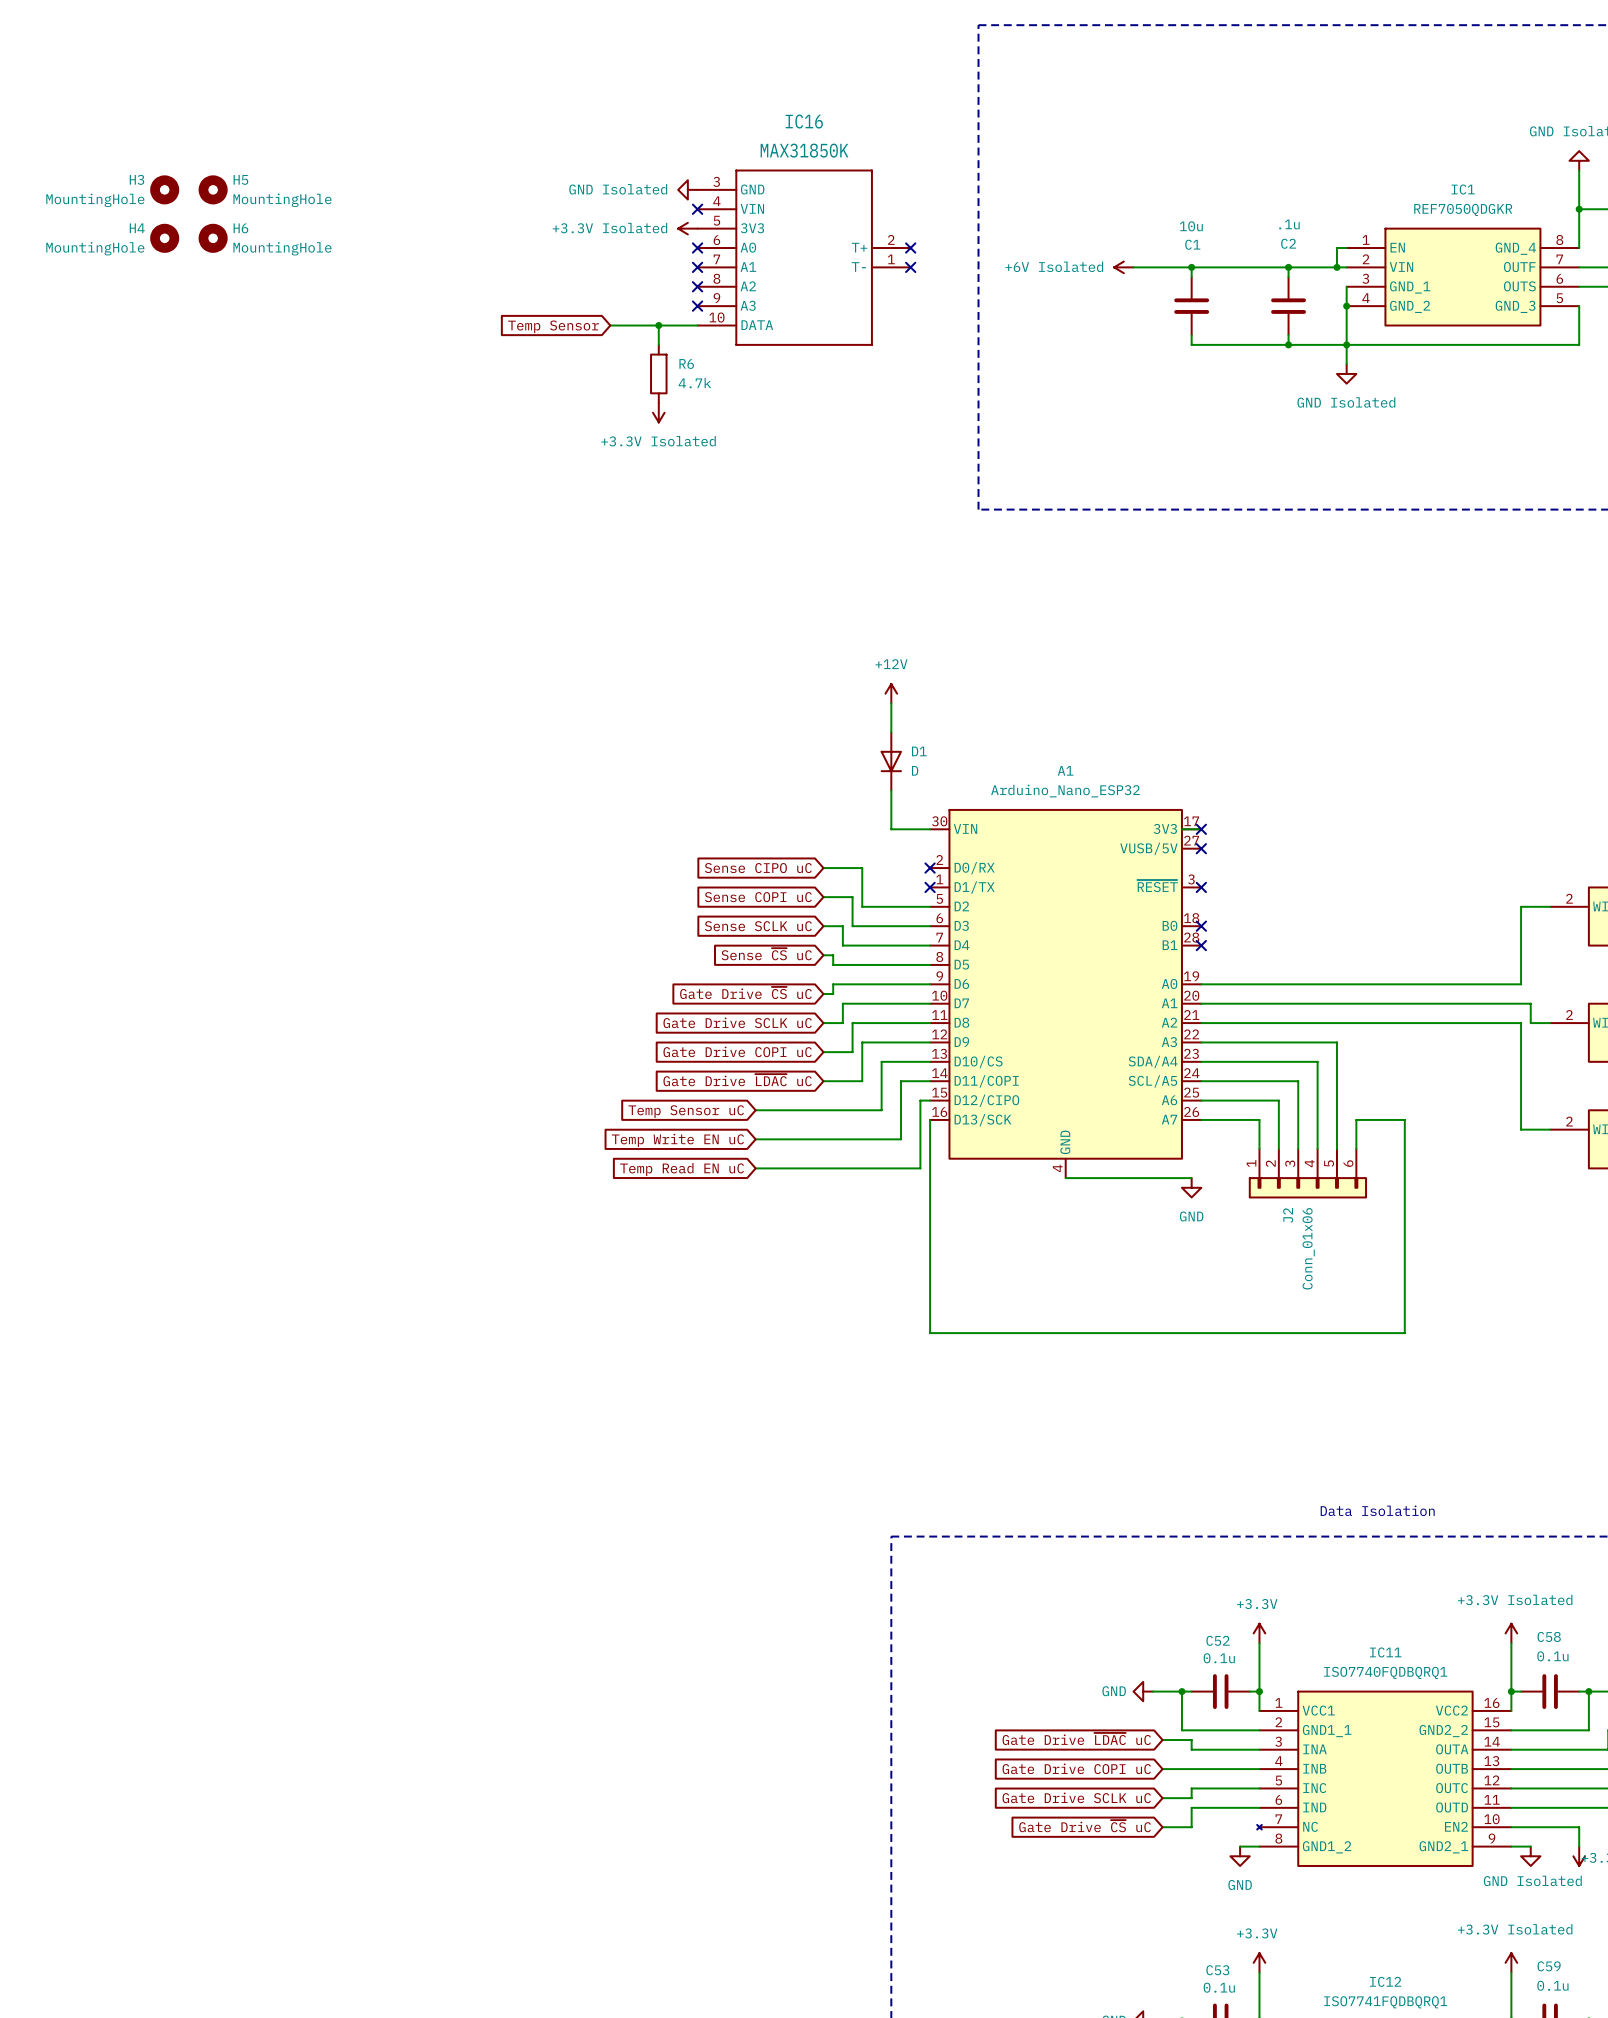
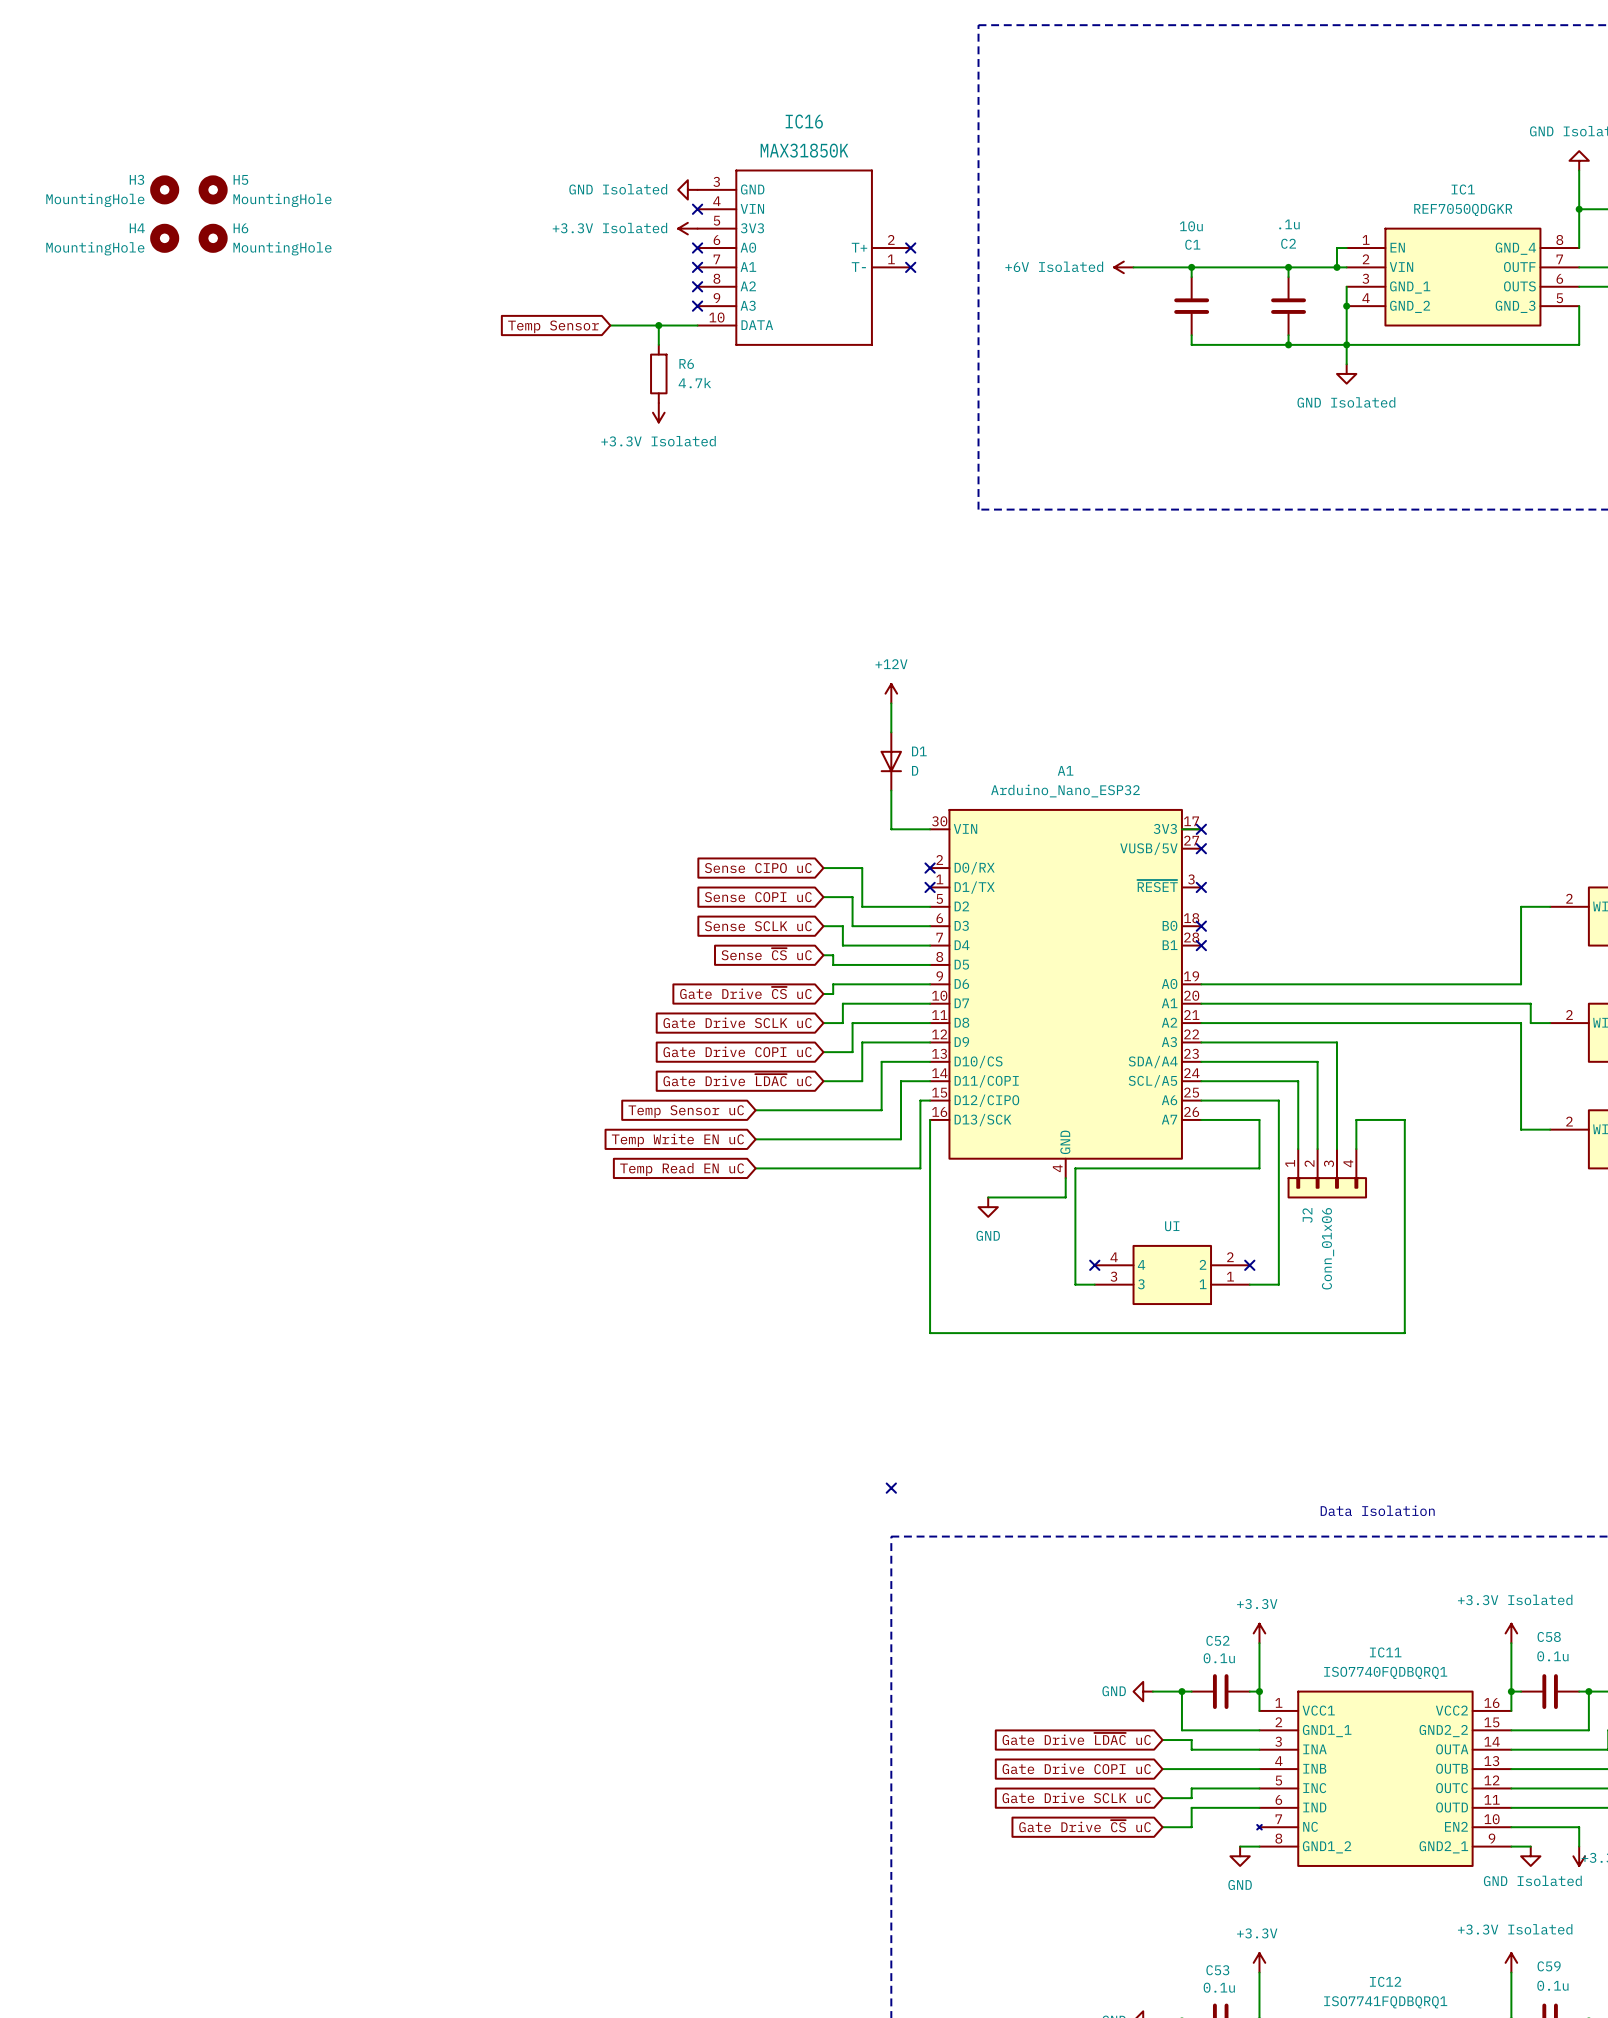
J2 symbol: [1248, 1149, 1368, 1199] -> [1287, 1149, 1368, 1199]
wire: none -> (1259, 1149) (1259, 1168) (1075, 1168) (1075, 1284) (1094, 1284)
wire: none -> (1278, 1149) (1278, 1284) (1249, 1284)
wire: (1065, 1178) (1191, 1178) -> (1065, 1178) (1065, 1197) (988, 1197)
power symbol: GND (1191, 1187) -> none
power symbol: none -> GND (988, 1207)
no-connect mark: none -> (1094, 1265)
no-connect mark: none -> (1249, 1265)
part: none -> UI (1172, 1274)
no-connect mark: none -> (891, 1488)

